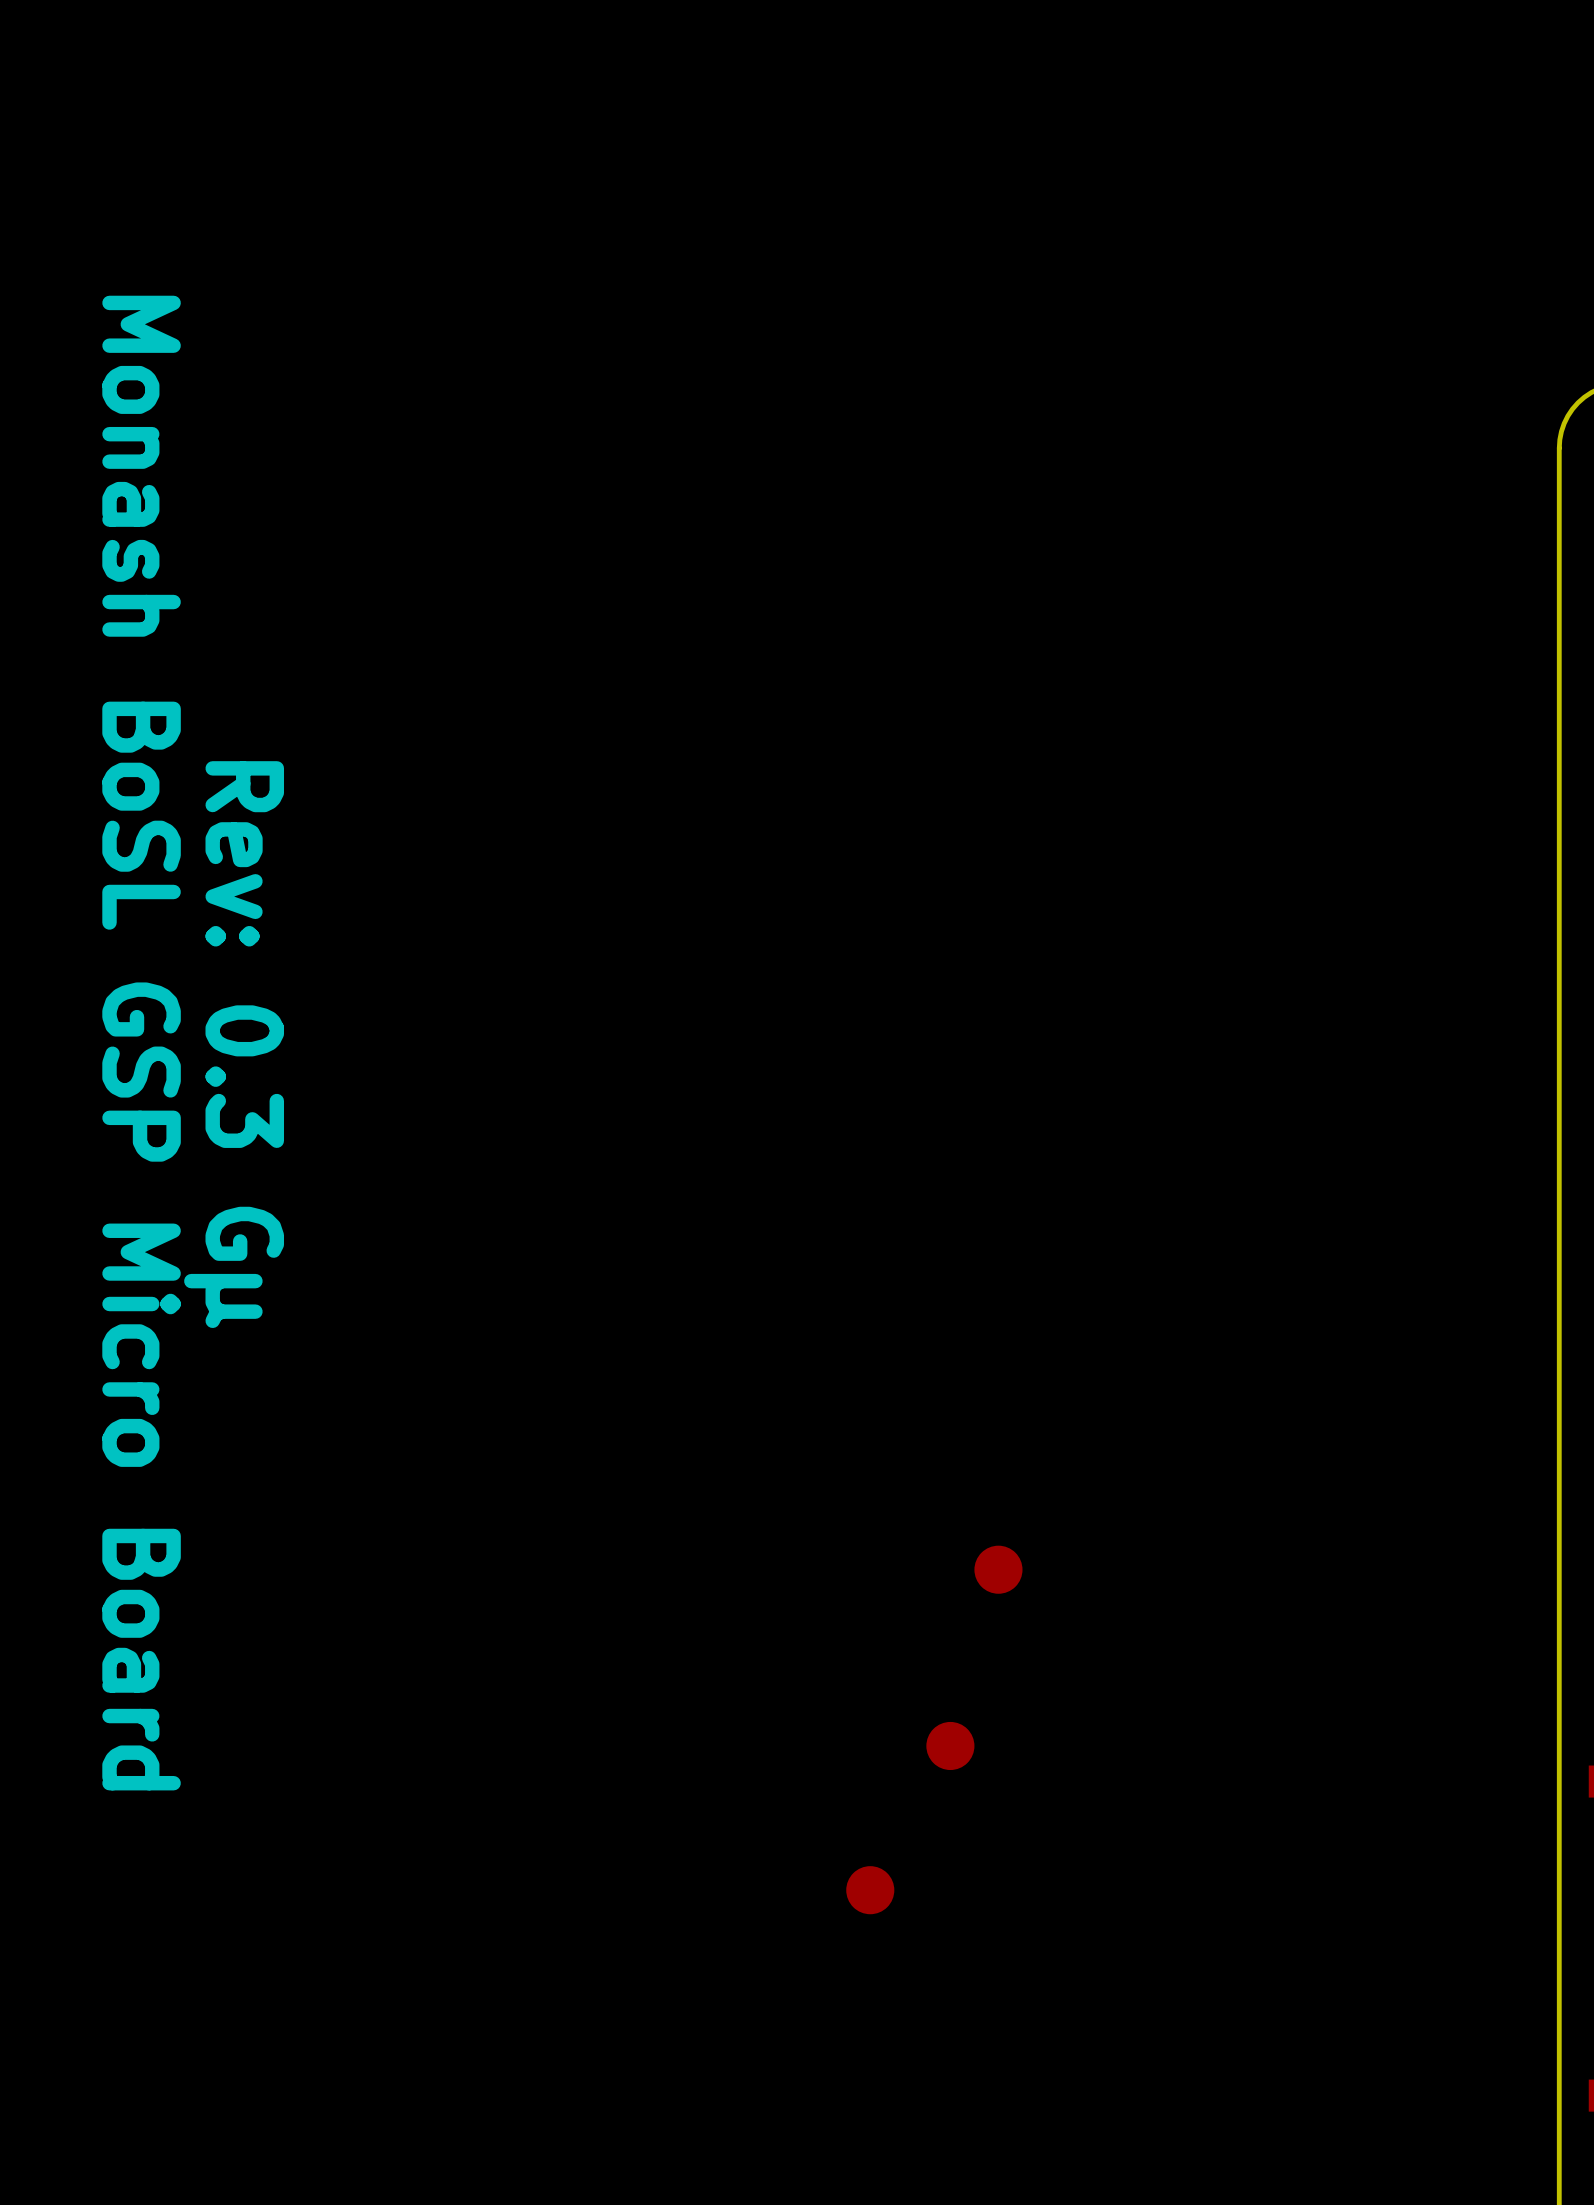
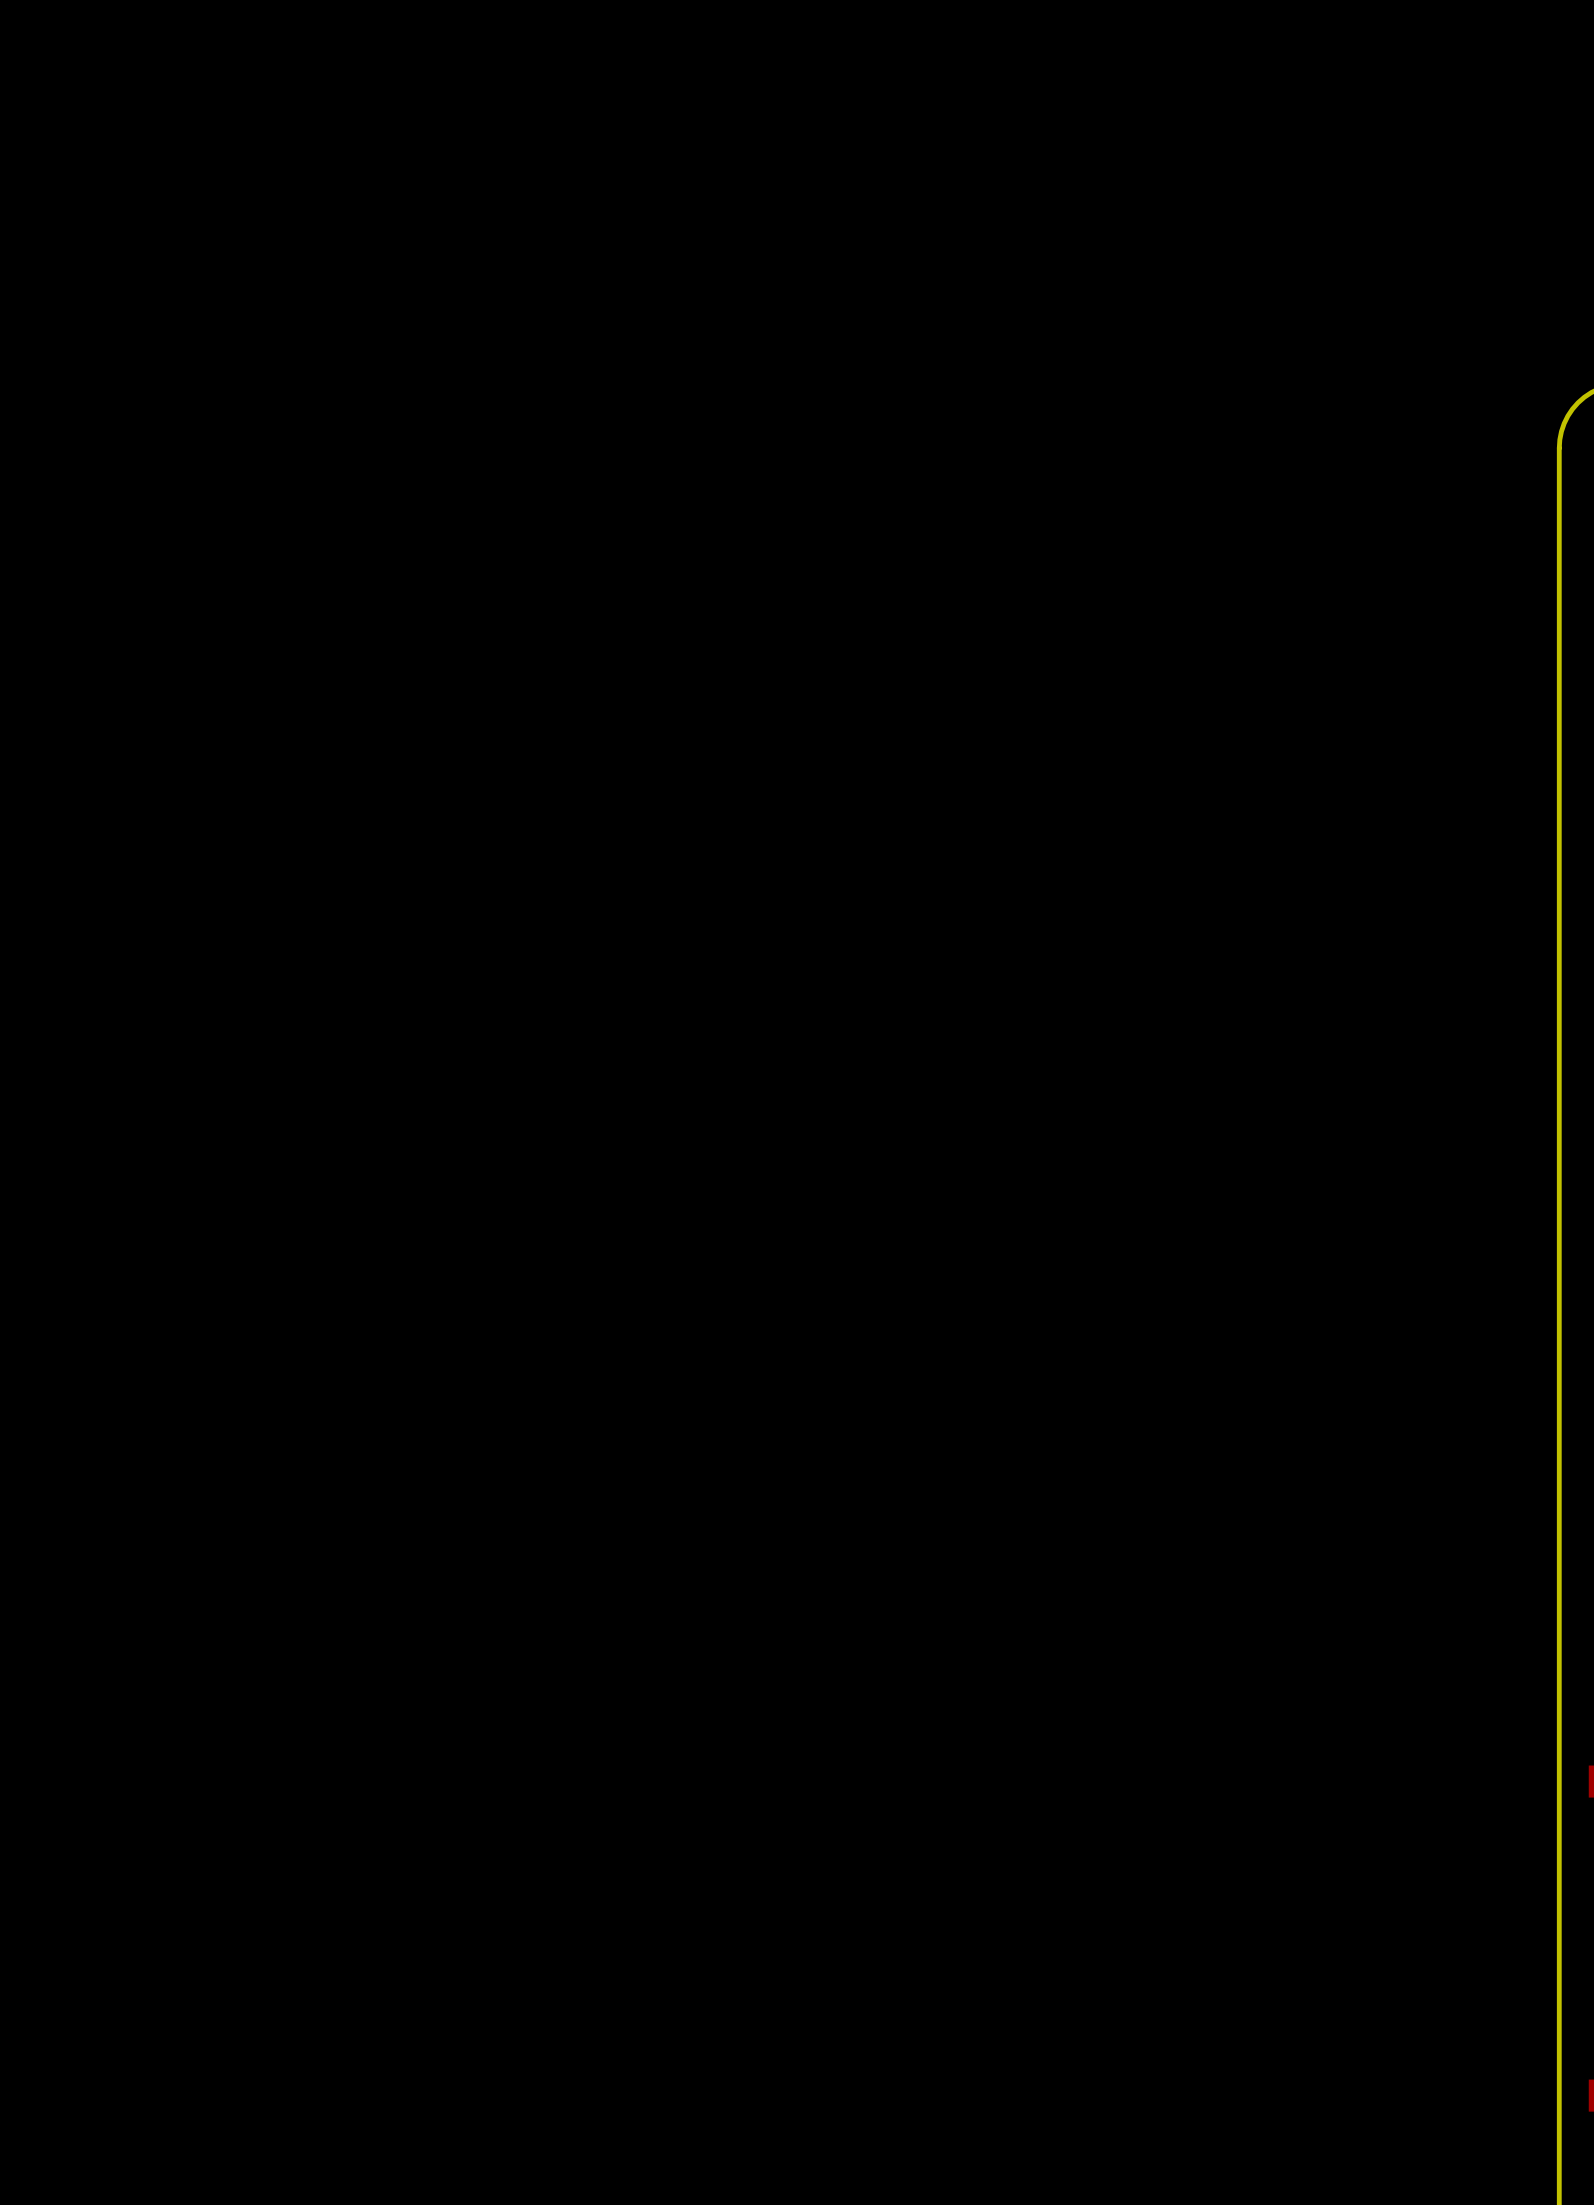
text: Monash BoSL GSP Micro Board (141, 1043) -> none
text: Rev: 0.3 Gμ (234, 1044) -> none
part: (998, 1569) -> none
part: (950, 1745) -> none
part: (870, 1890) -> none

